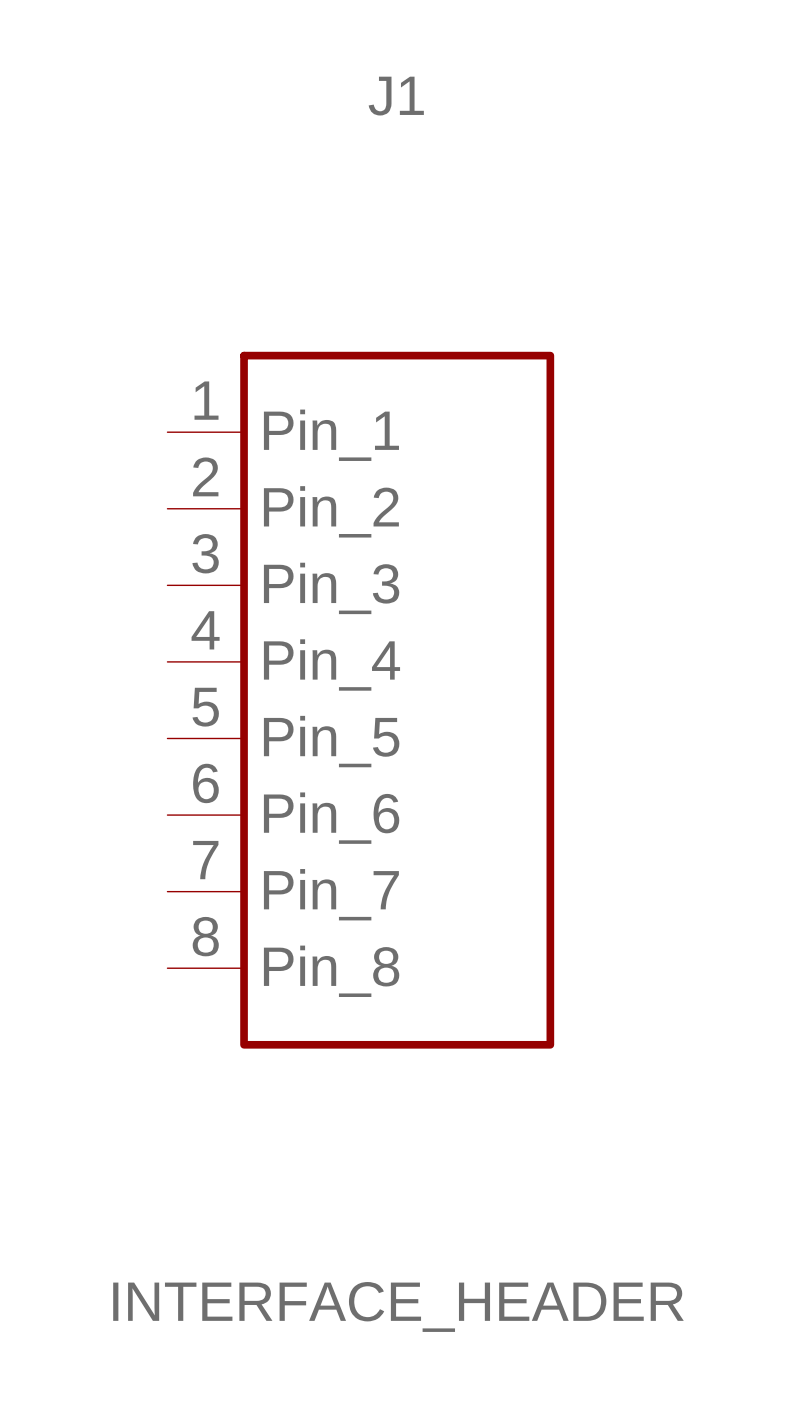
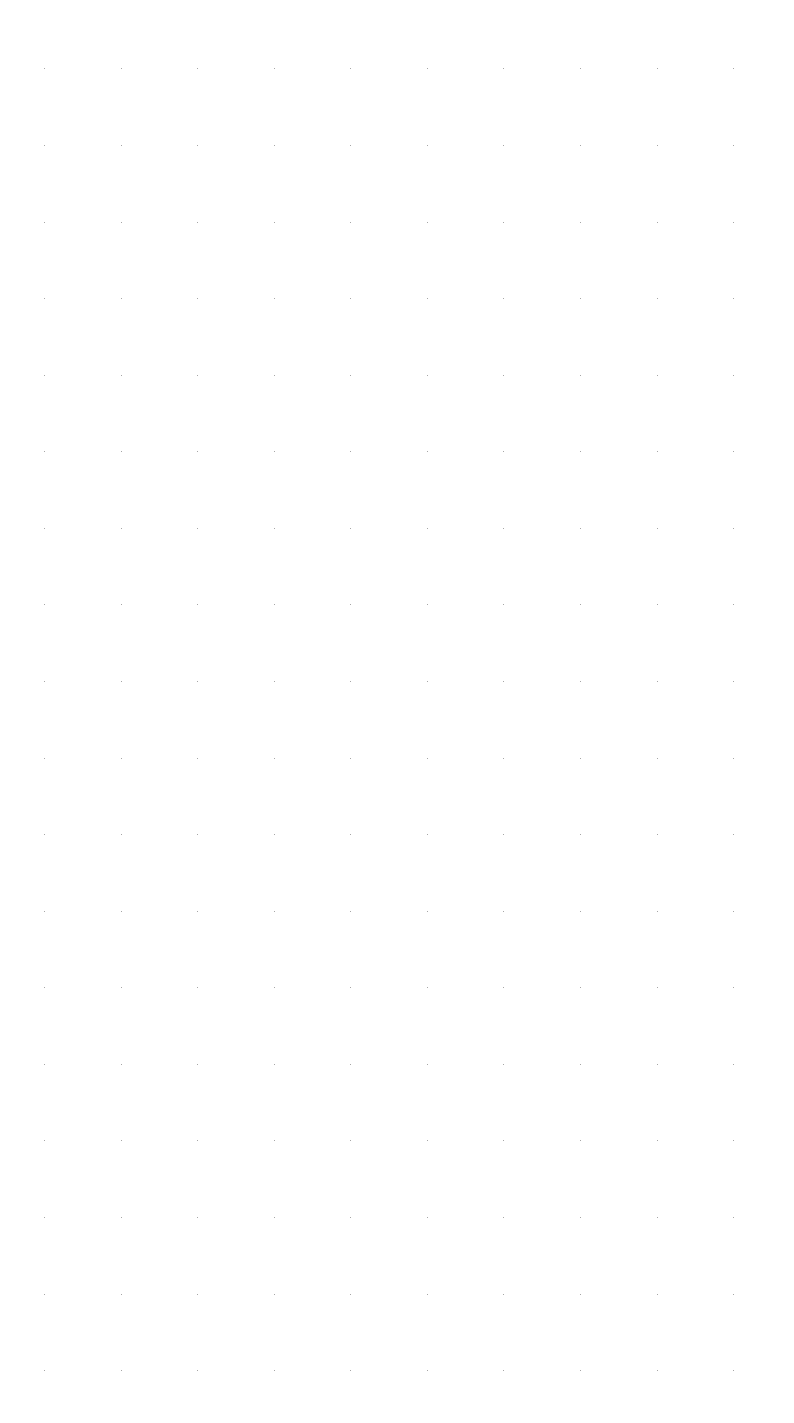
J1: INTERFACE_HEADER (360, 700) -> none

